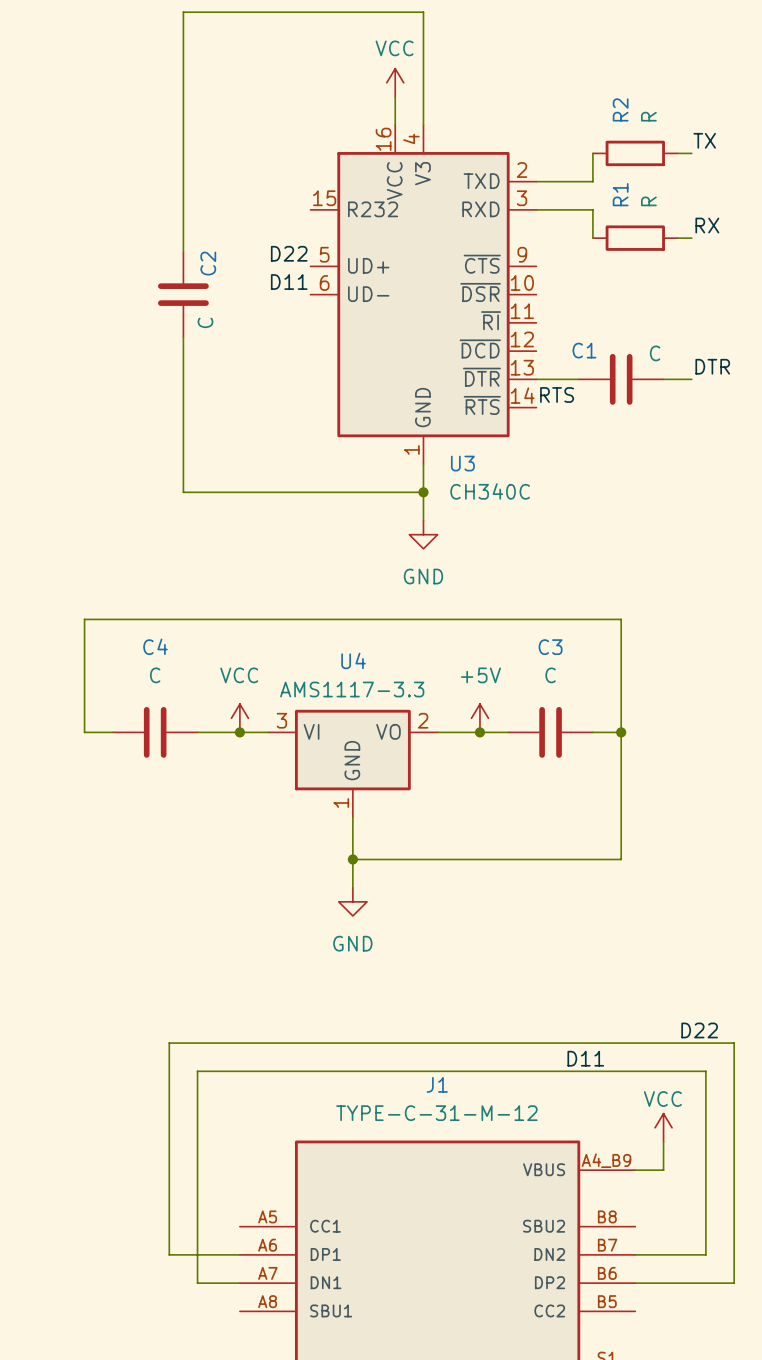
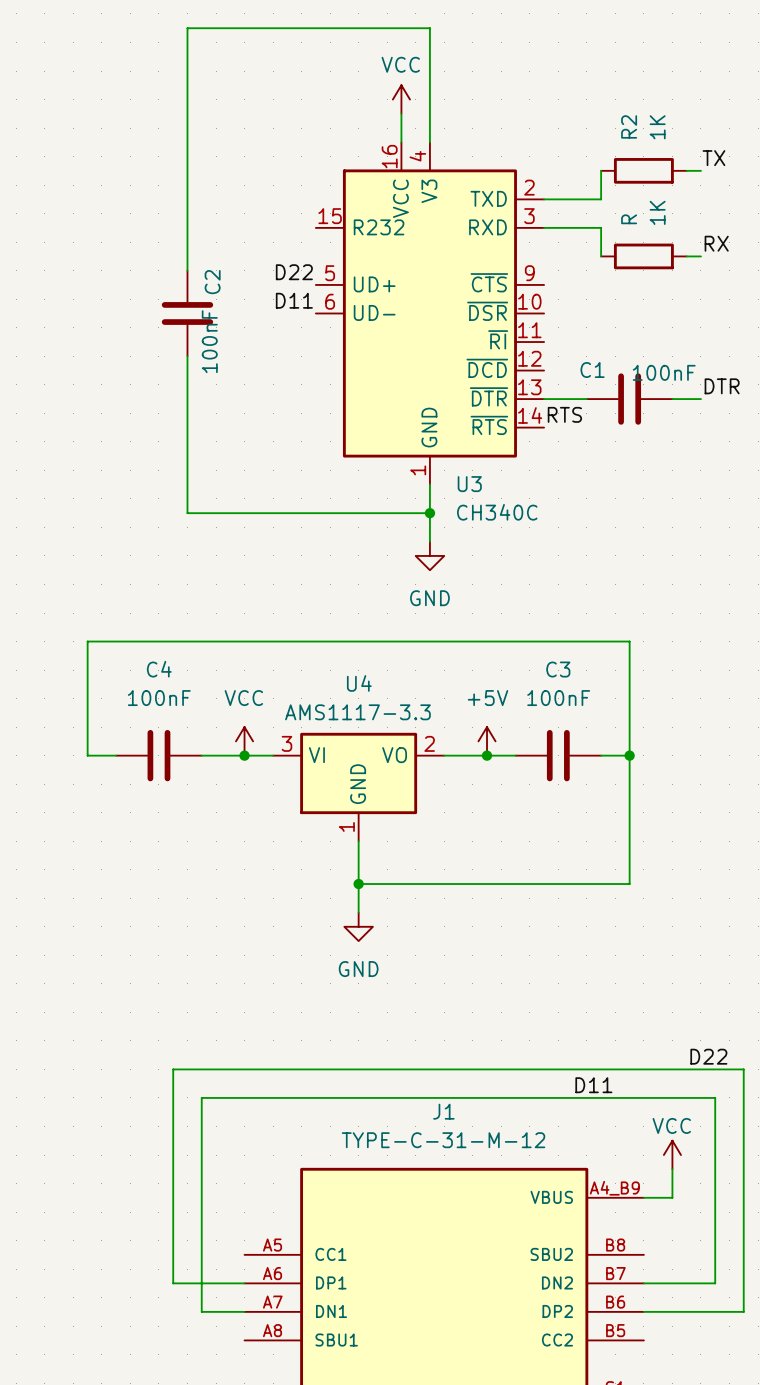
R2 value: R (648, 116) -> 1K (657, 127)
R1 name: R1 (620, 194) -> R (629, 219)
R1 value: R (648, 201) -> 1K (657, 212)
C2 value: C (205, 322) -> 100nF (209, 341)
C1 value: C (655, 353) -> 100nF (664, 372)
C4 value: C (155, 675) -> 100nF (159, 698)
C3 value: C (550, 675) -> 100nF (558, 698)

